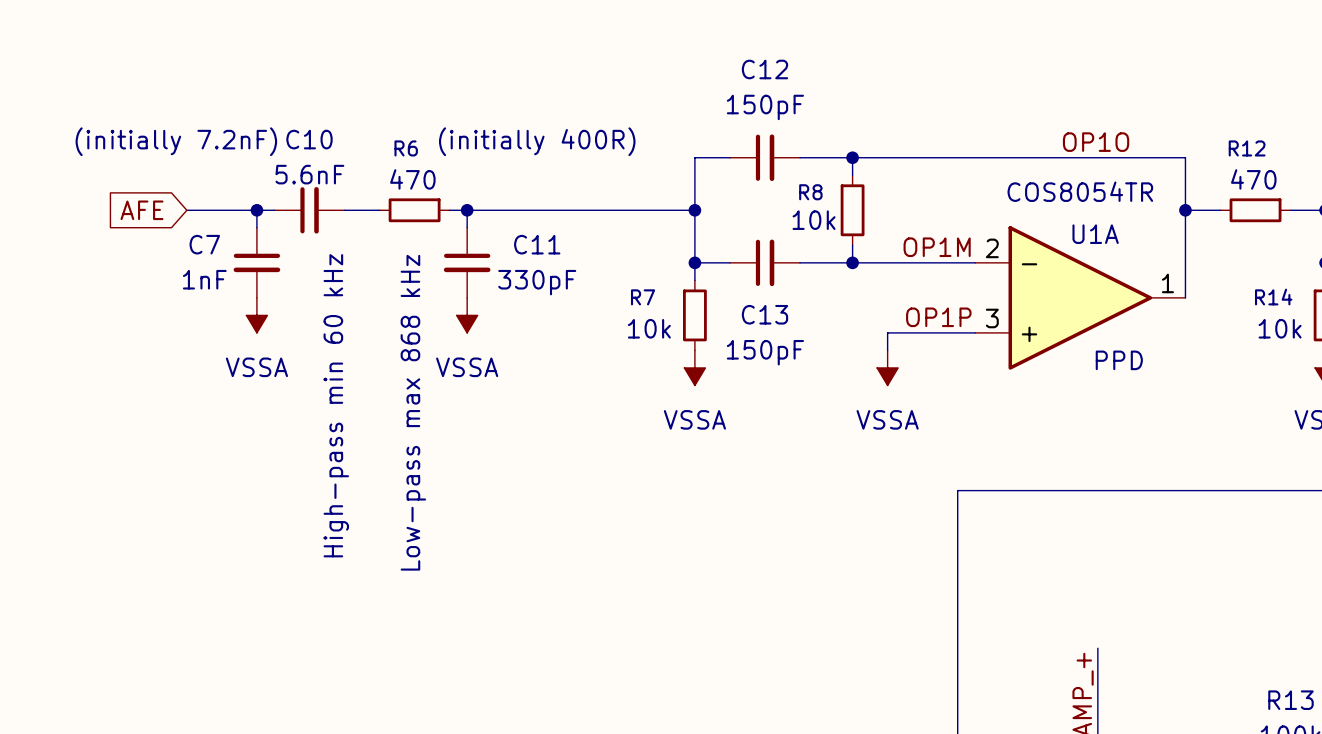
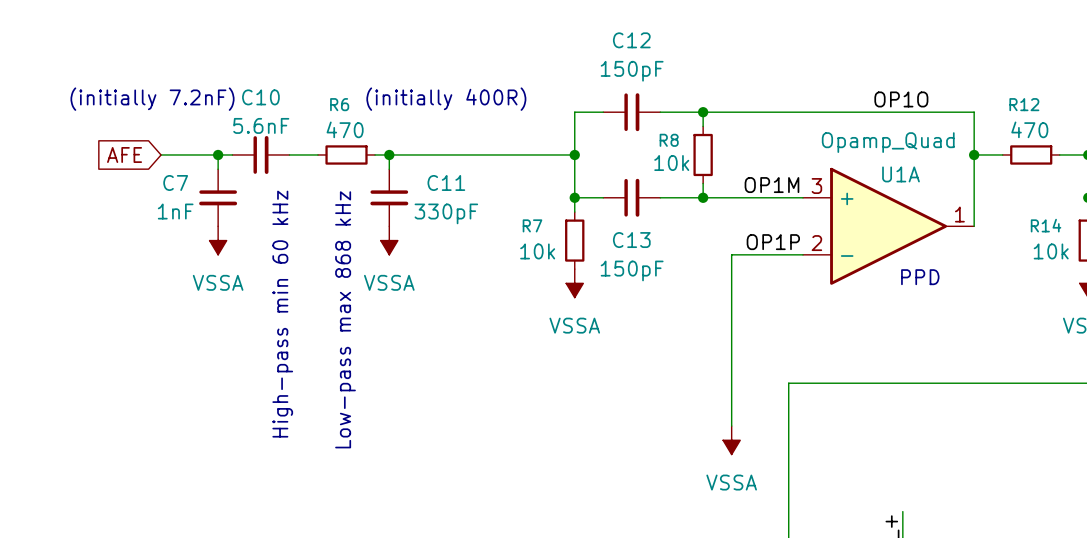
U1A value: COS8054TR (1080, 191) -> Opamp_Quad (888, 142)
U1A flip: as is (1080, 297) -> up-down (888, 226)
wire: none -> (731, 269) (731, 426)
power symbol position: VSSA (887, 367) -> VSSA (731, 440)

